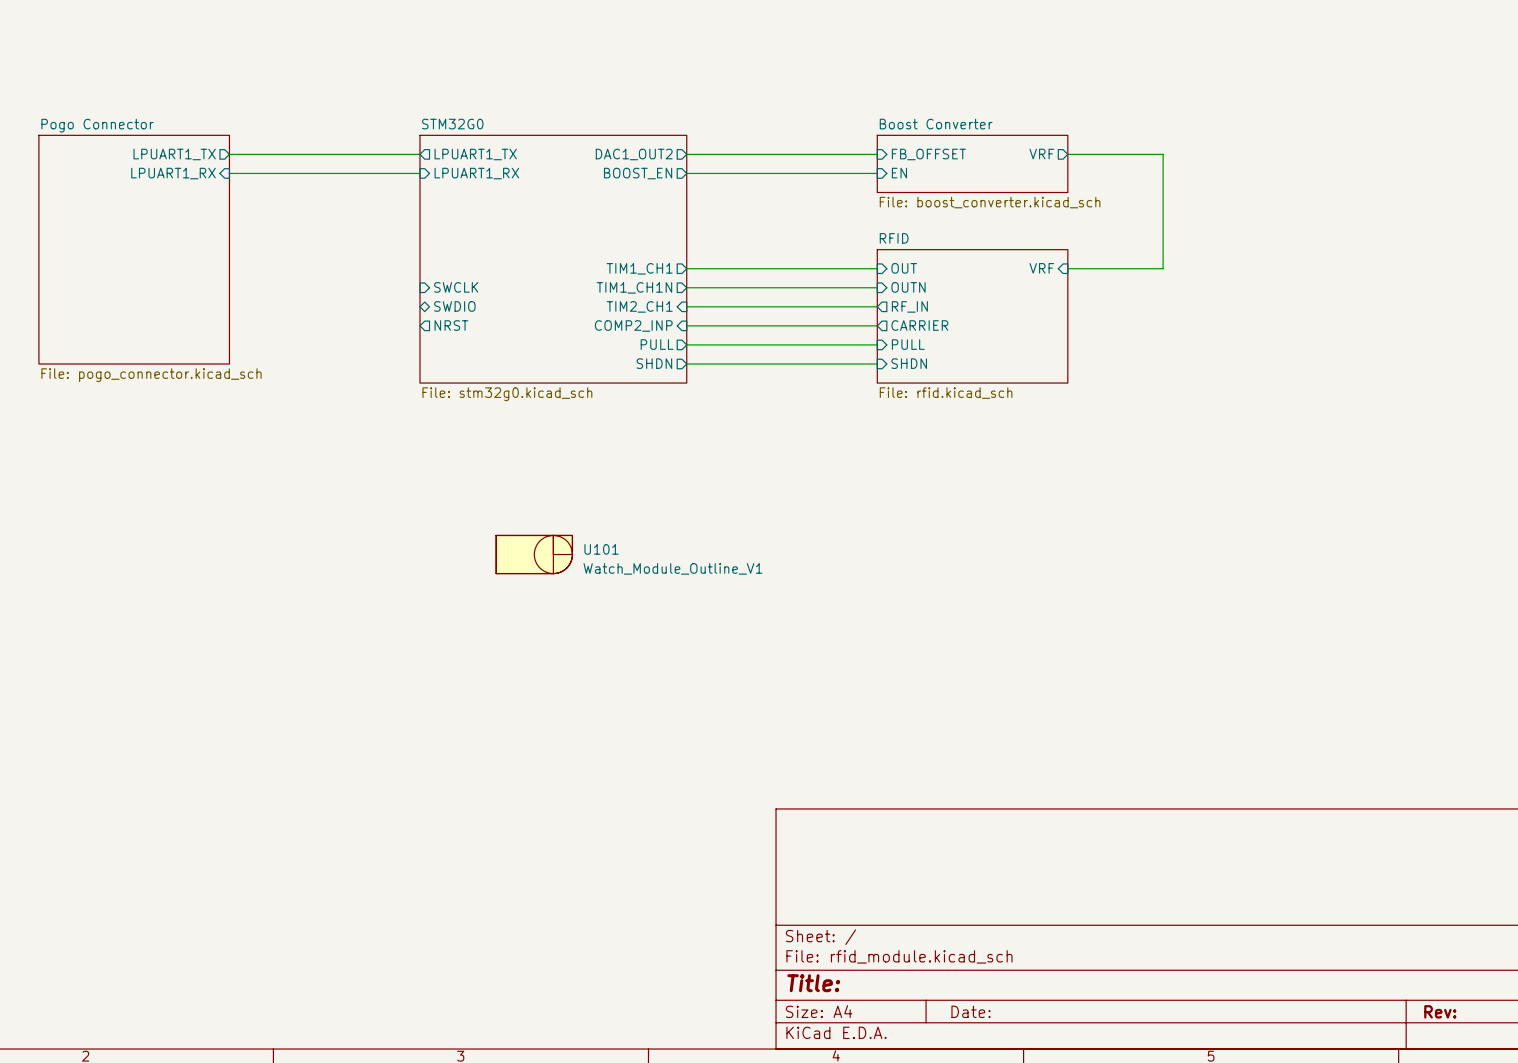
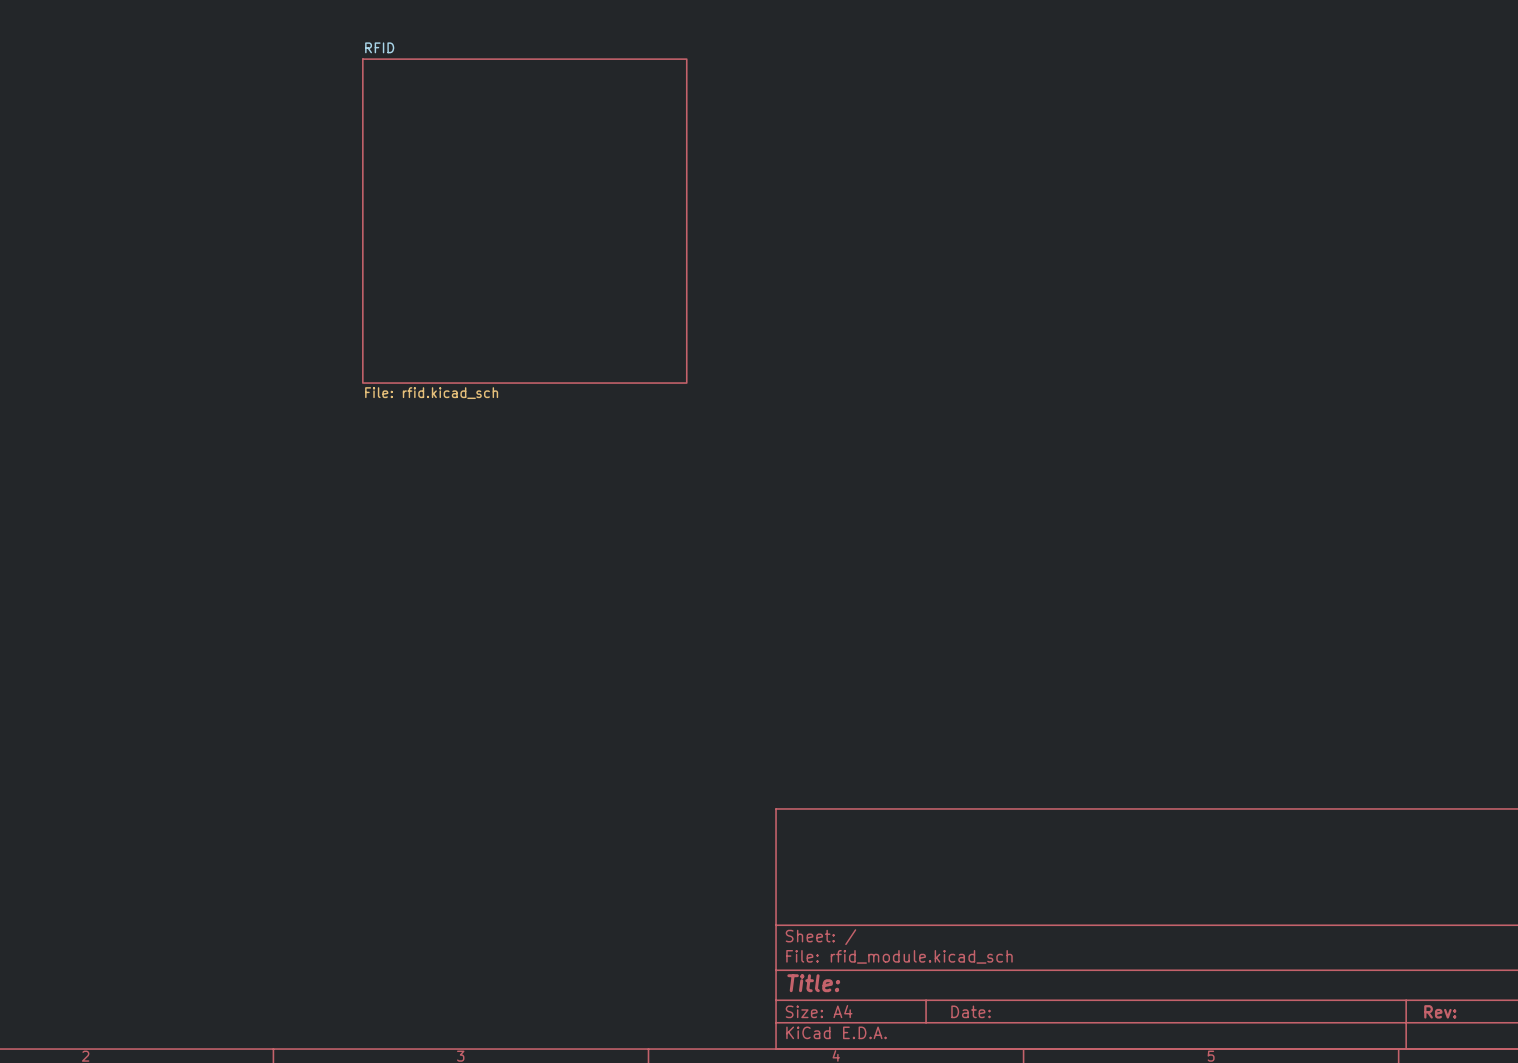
sheet pin: LPUART1_TX (174, 154) -> none
wire: (229, 154) (420, 154) -> none
sheet pin: LPUART1_TX (475, 154) -> none
sheet pin: DAC1_OUT2 (634, 154) -> none
wire: (686, 154) (877, 154) -> none
sheet pin: FB_OFFSET (928, 154) -> none
sheet pin: VRF (1041, 154) -> none
wire: (1067, 154) (1163, 154) (1163, 268) (1067, 268) -> none
sheet Boost Converter: File: boost_converter.kicad_sch (972, 163) -> none
sheet pin: LPUART1_RX (173, 173) -> none
wire: (229, 173) (420, 173) -> none
sheet pin: LPUART1_RX (476, 173) -> none
sheet pin: BOOST_EN (638, 173) -> none
wire: (686, 173) (877, 173) -> none
sheet pin: EN (899, 173) -> none
sheet RFID: none -> File: rfid.kicad_sch (524, 221)
sheet Pogo Connector: File: pogo_connector.kicad_sch (134, 249) -> none
sheet STM32G0: File: stm32g0.kicad_sch (553, 259) -> none
sheet pin: TIM1_CH1 (639, 268) -> none
wire: (686, 268) (877, 268) -> none
sheet pin: OUT (904, 268) -> none
sheet pin: VRF (1041, 268) -> none
sheet pin: SWCLK (456, 287) -> none
sheet pin: TIM1_CH1N (634, 287) -> none
wire: (686, 287) (877, 287) -> none
sheet pin: OUTN (908, 287) -> none
sheet pin: SWDIO (454, 306) -> none
sheet pin: TIM2_CH1 (639, 306) -> none
wire: (686, 306) (877, 306) -> none
sheet pin: RF_IN (909, 306) -> none
sheet RFID: File: rfid.kicad_sch (972, 316) -> none
sheet pin: NRST (451, 325) -> none
sheet pin: COMP2_INP (633, 325) -> none
wire: (686, 325) (877, 325) -> none
sheet pin: CARRIER (919, 325) -> none
sheet pin: PULL (657, 344) -> none
wire: (686, 344) (877, 344) -> none
sheet pin: PULL (908, 344) -> none
sheet pin: SHDN (654, 363) -> none
wire: (686, 363) (877, 363) -> none
sheet pin: SHDN (909, 363) -> none
U101: Watch_Module_Outline_V1 (534, 554) -> none

